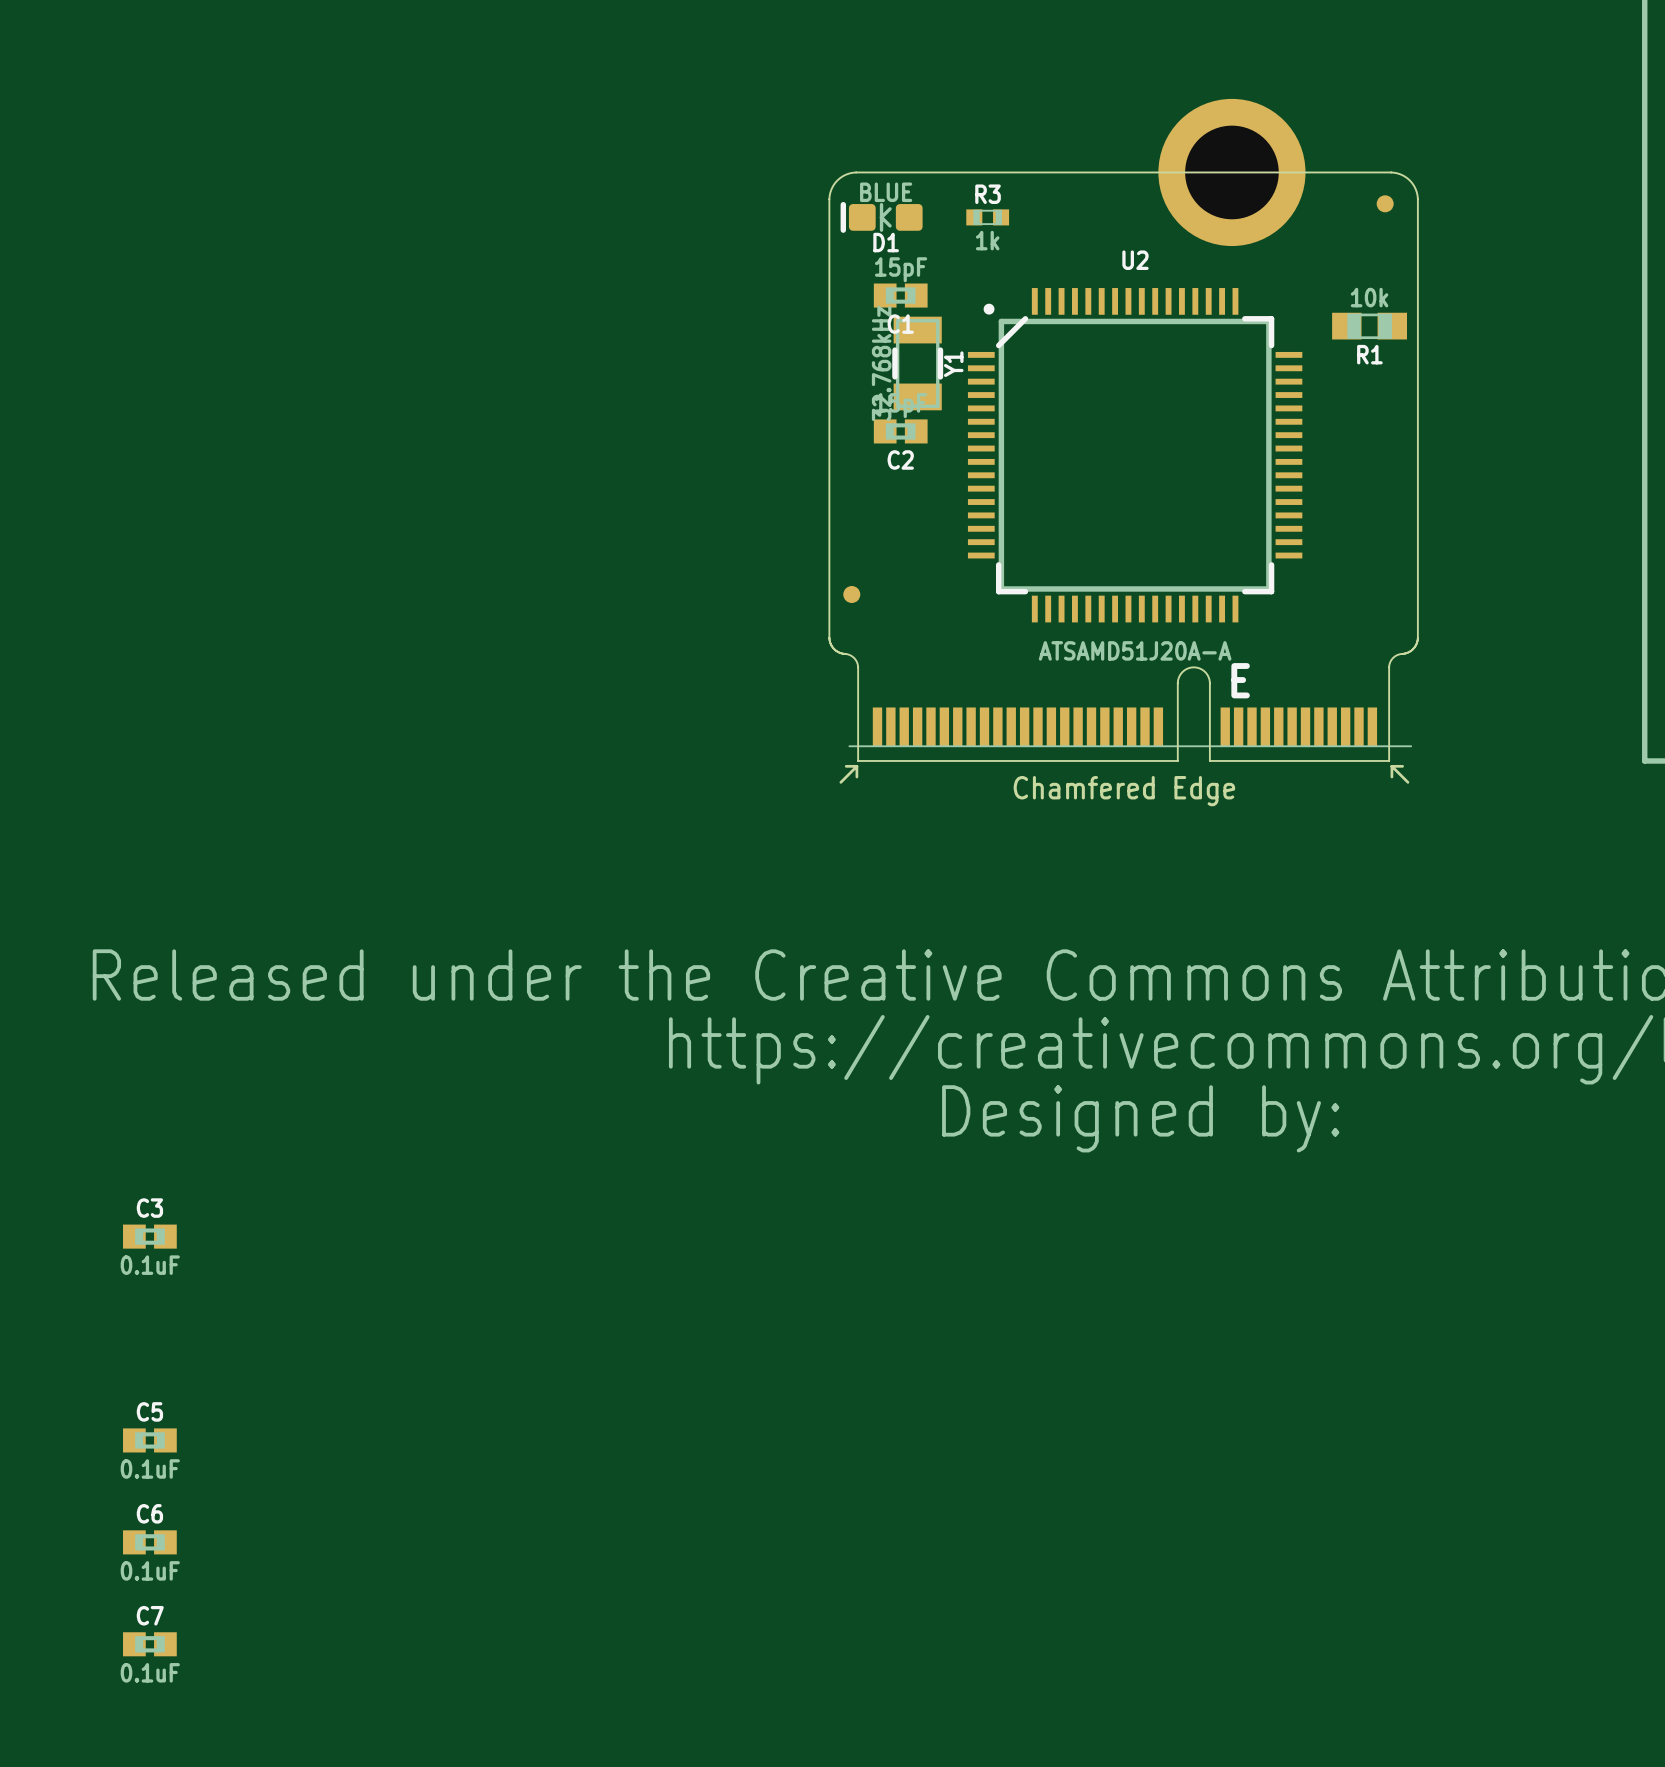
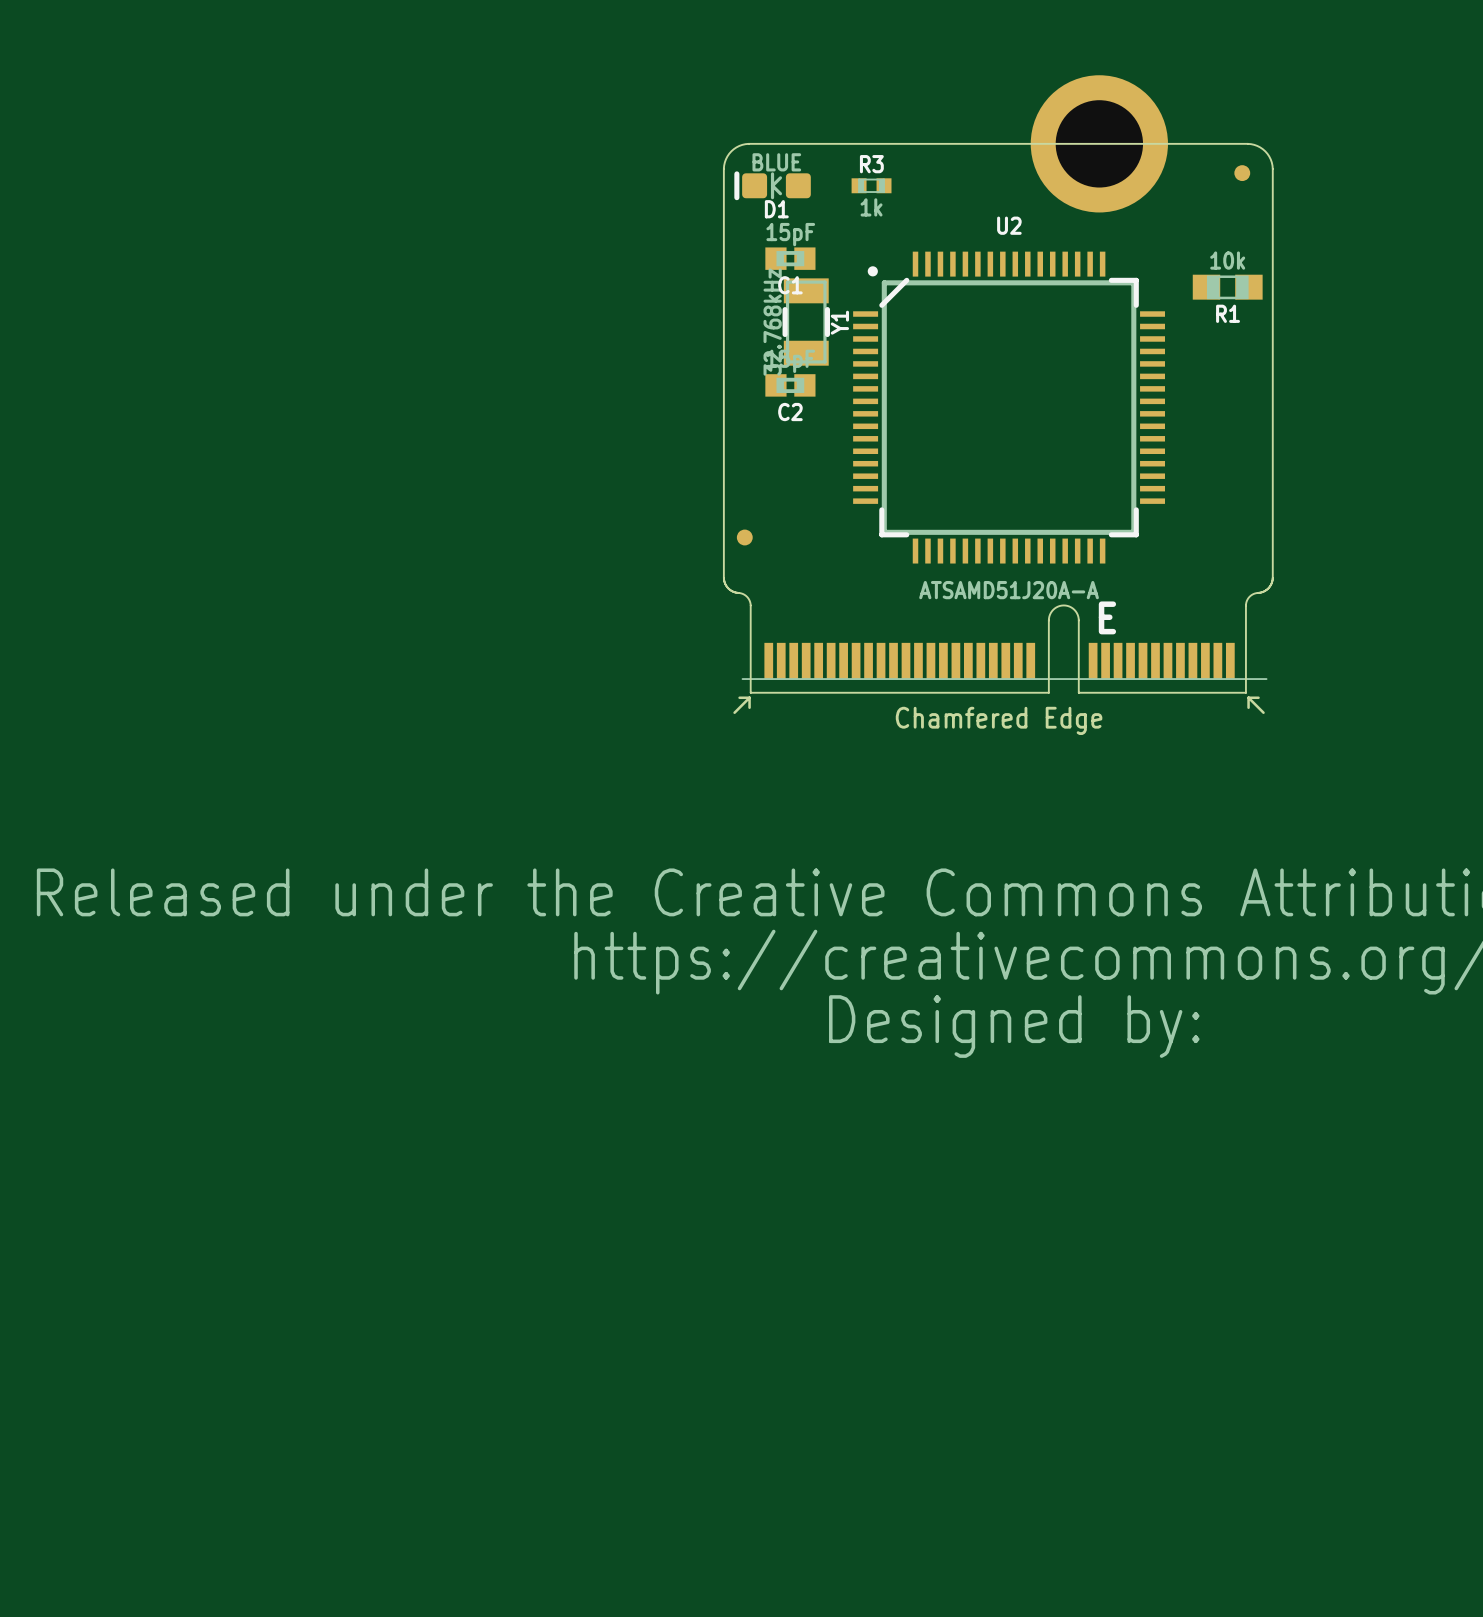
C3: 0.1uF (149, 1236) -> none
C5: 0.1uF (149, 1440) -> none
C6: 0.1uF (149, 1542) -> none
C7: 0.1uF (149, 1644) -> none

